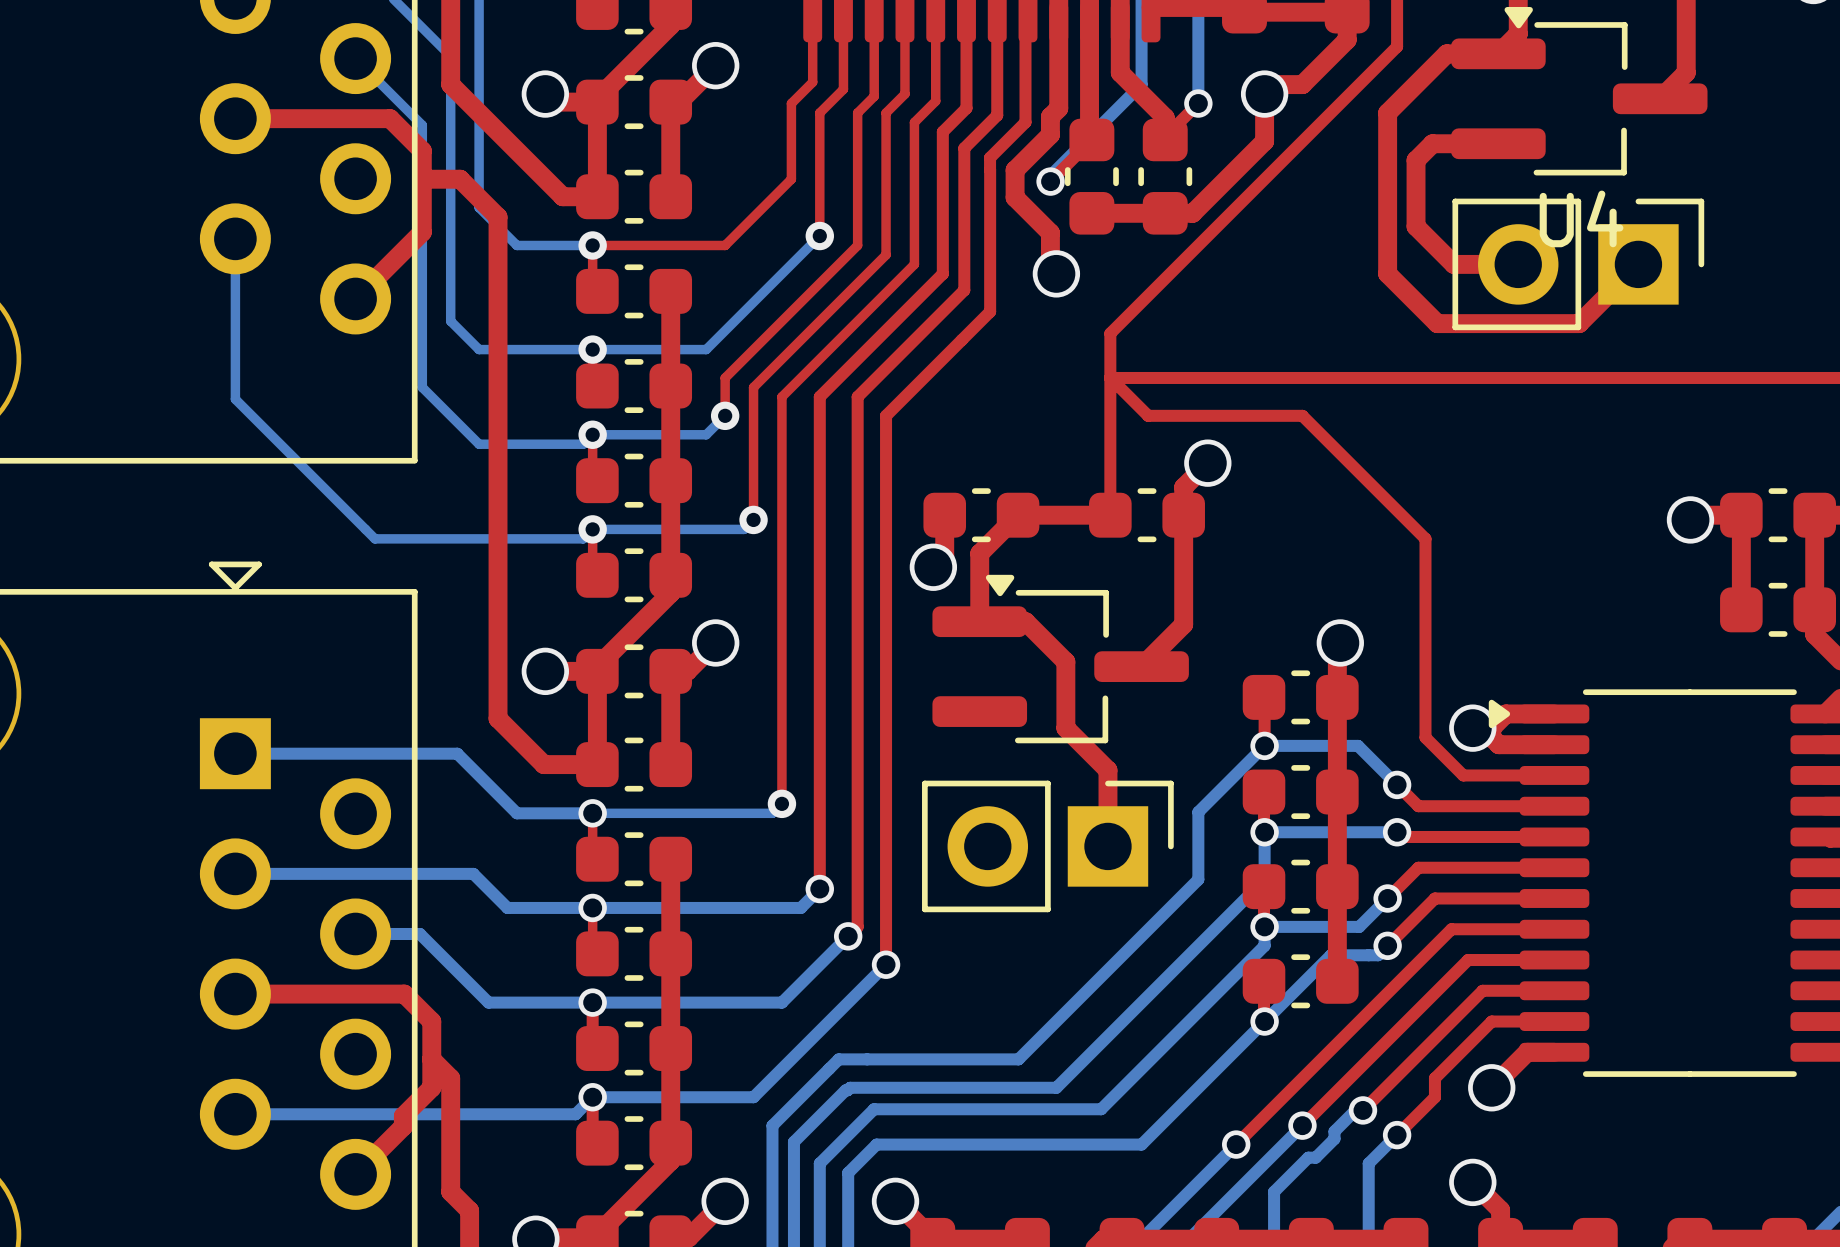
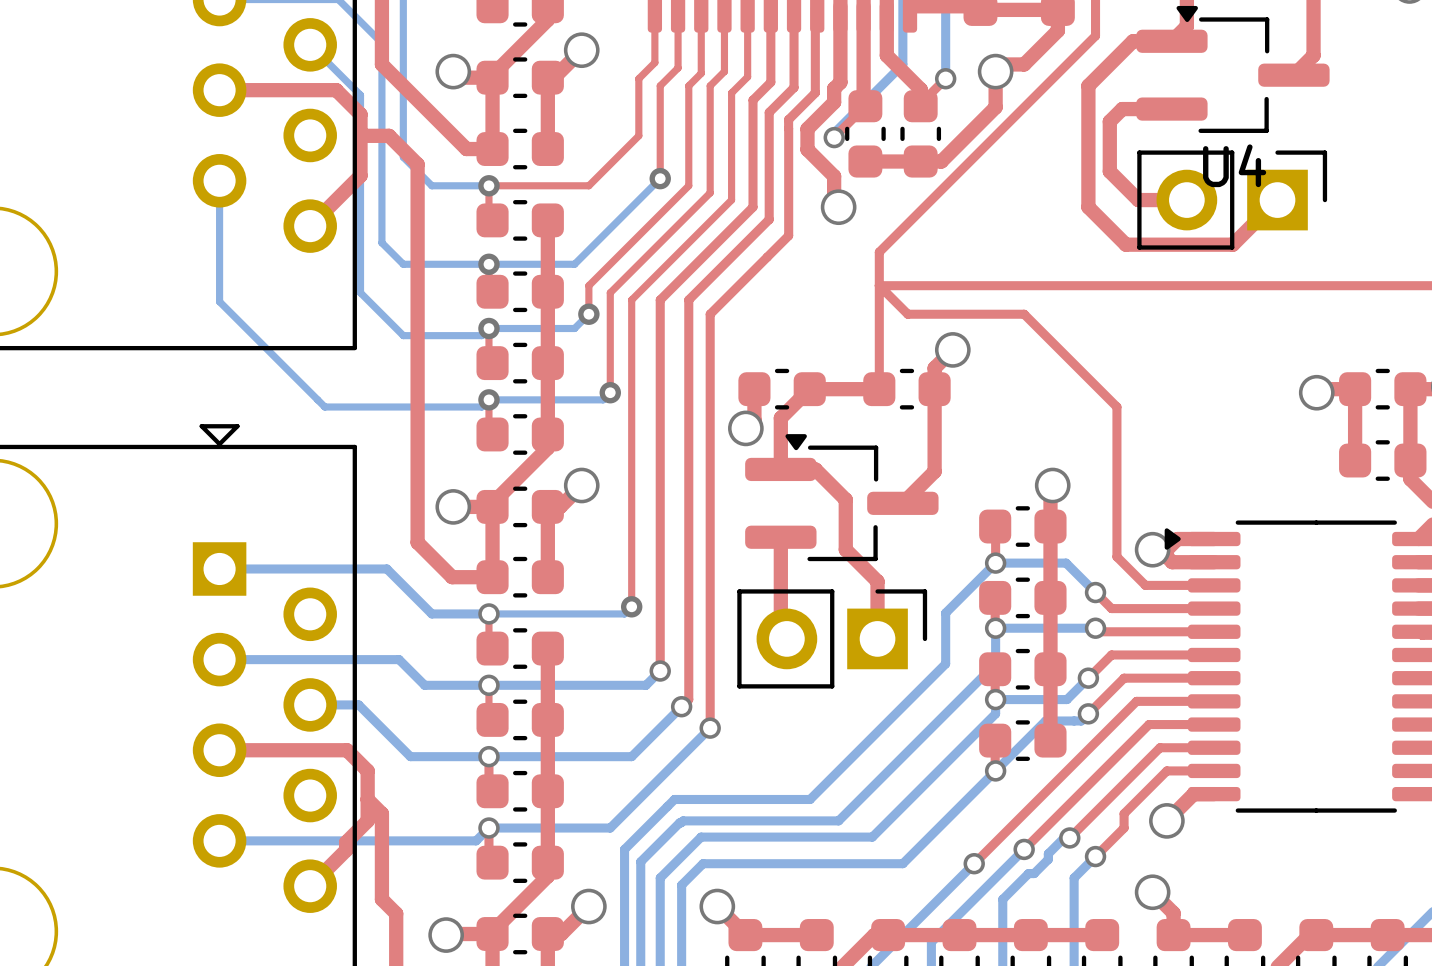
top track: none -> (780, 537) (780, 632) (786, 638)

